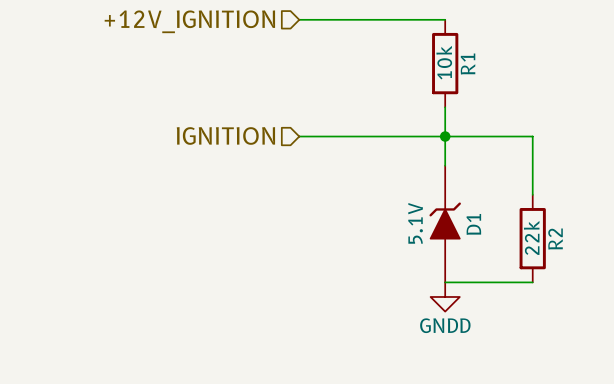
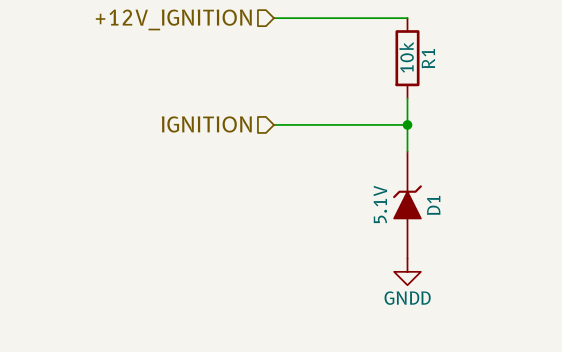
wire: (445, 136) (532, 136) (532, 194) -> none
R2: 22k (532, 238) -> none
wire: (445, 282) (532, 282) -> none

